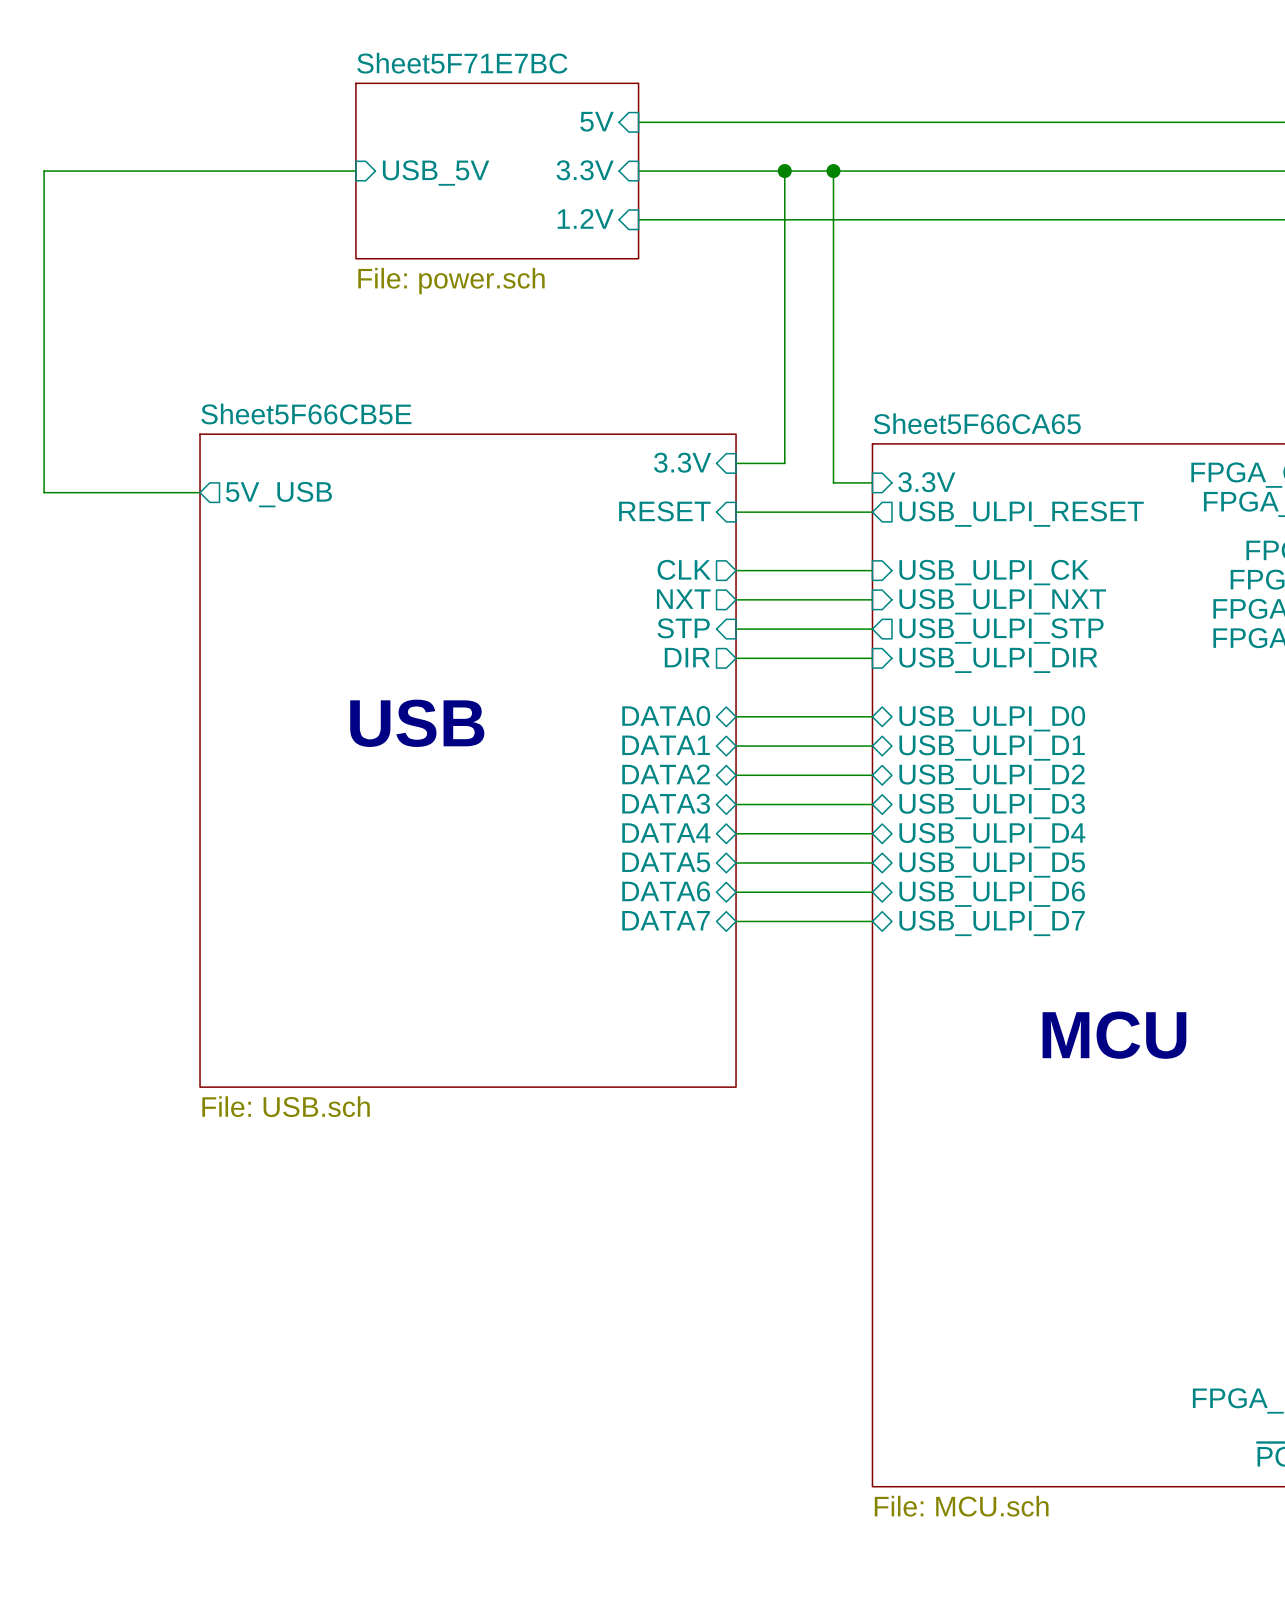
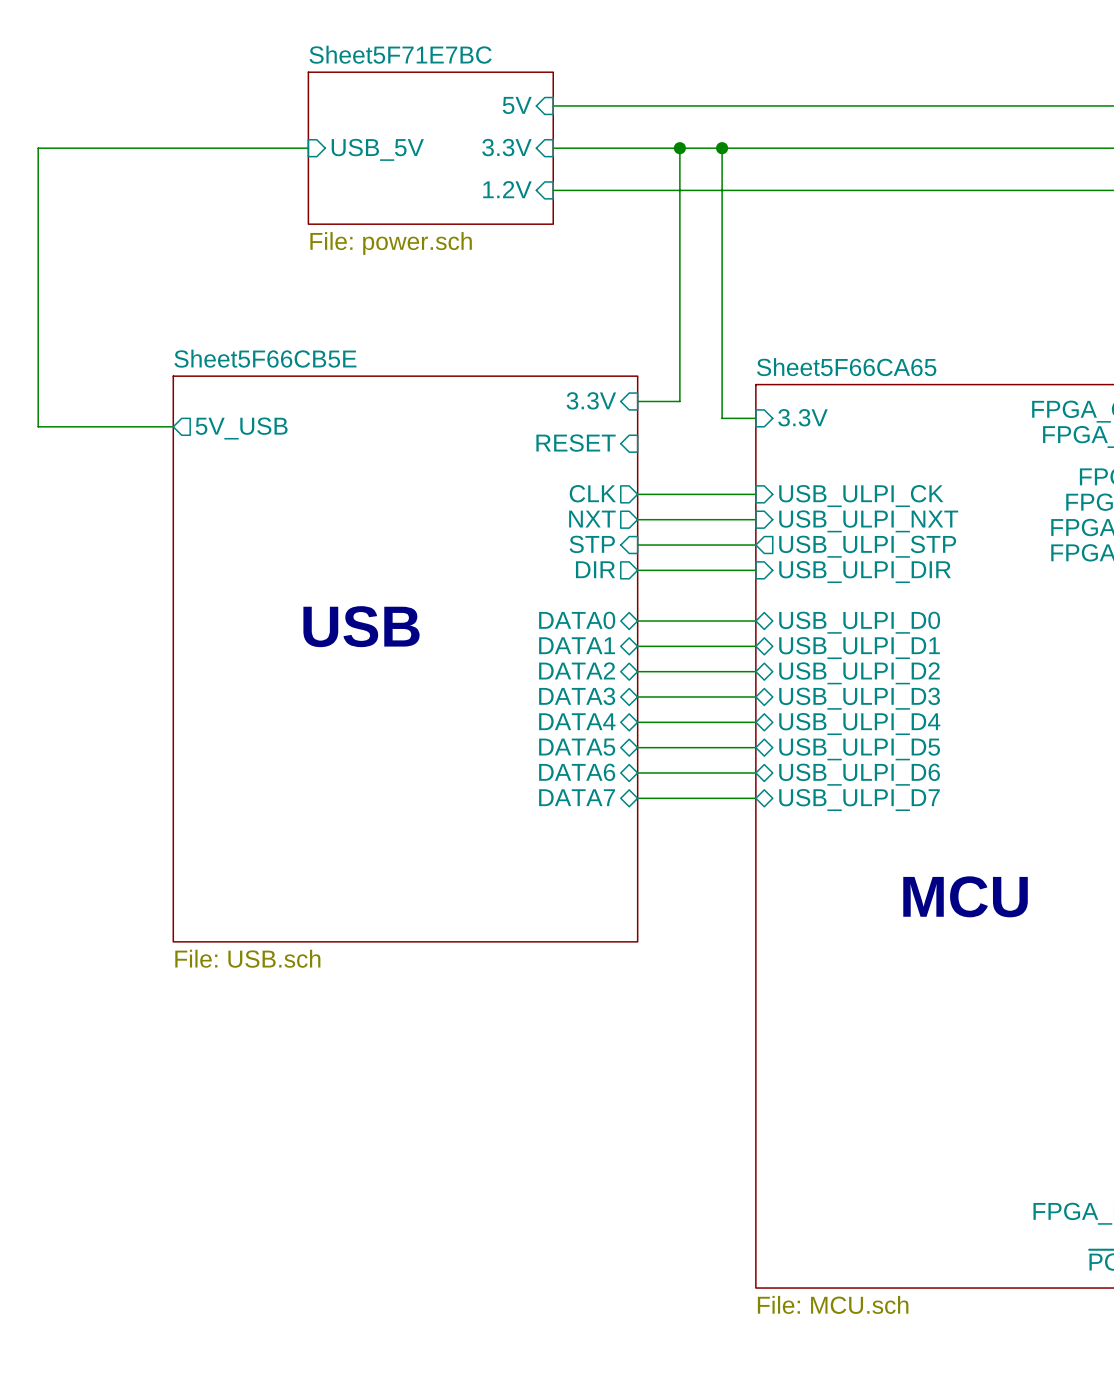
wire: (736, 512) (872, 512) -> none
sheet pin: USB_ULPI_RESET (1021, 514) -> none

